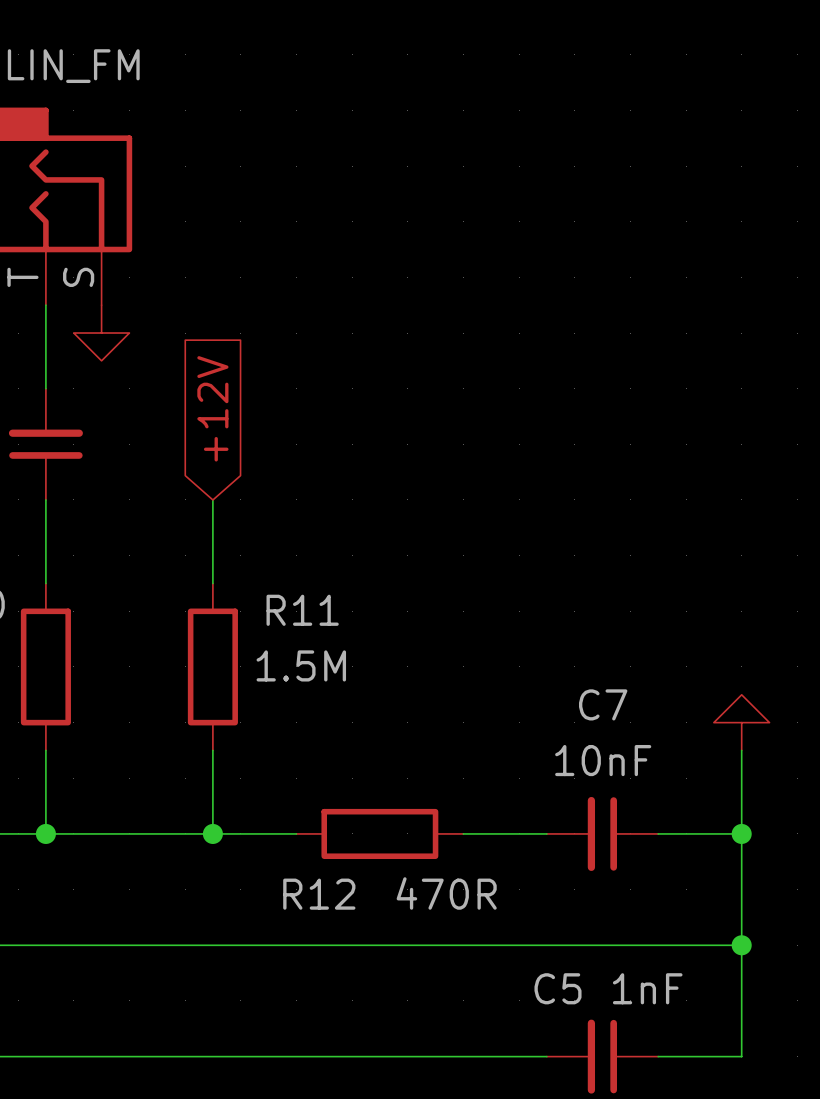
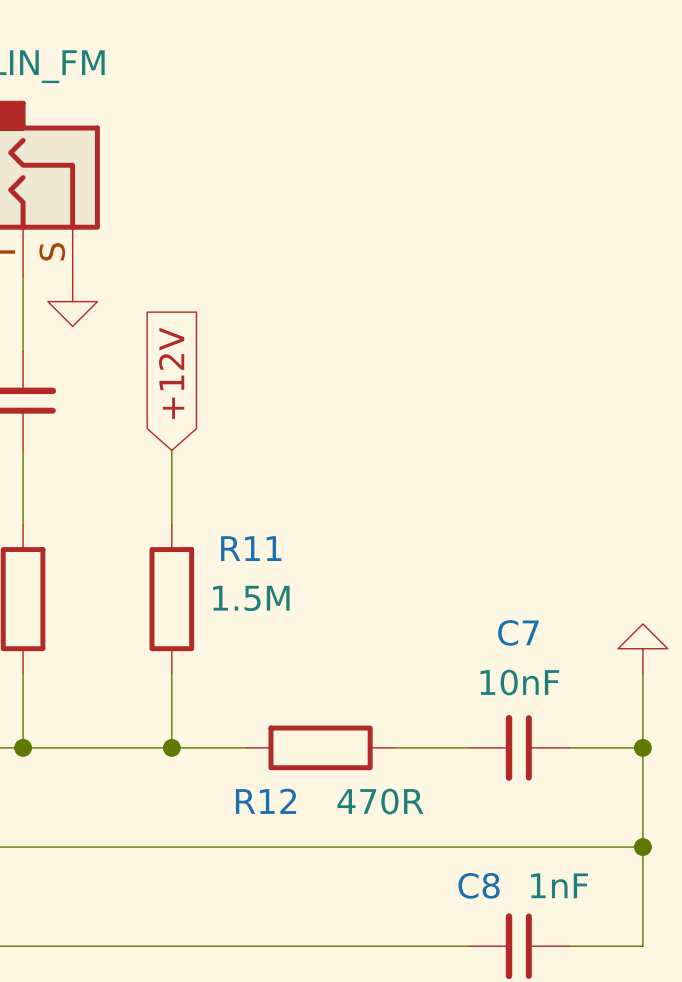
C5 name: C5 (558, 988) -> C8 (479, 885)

